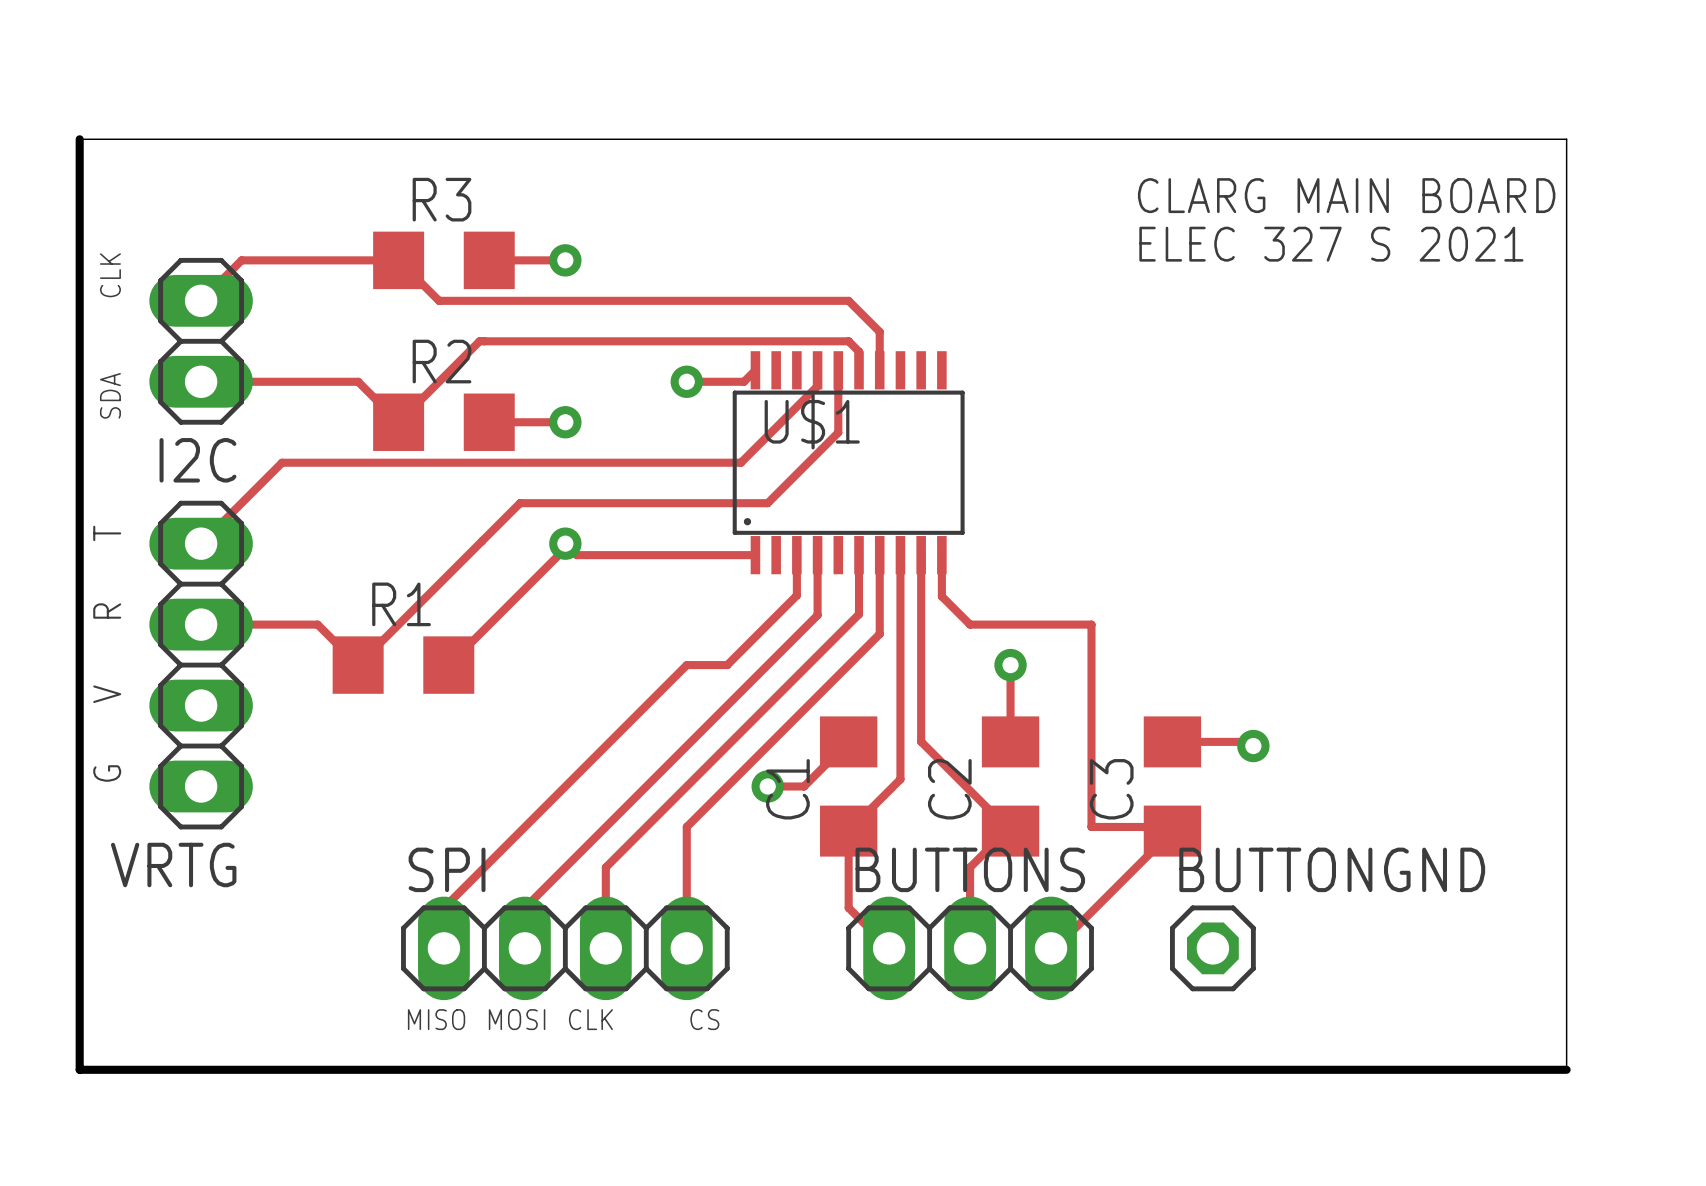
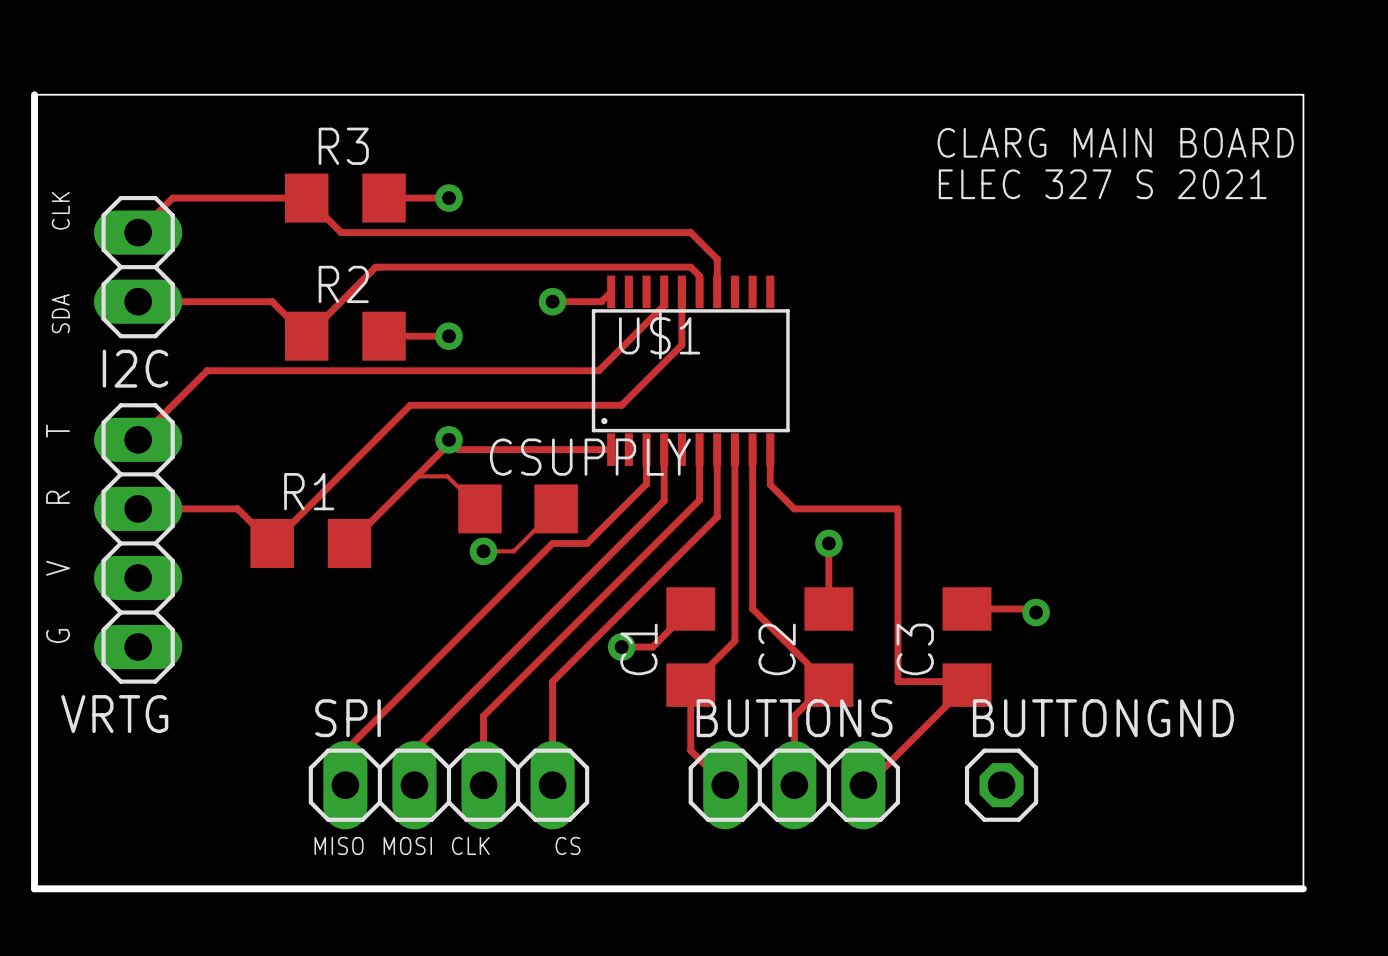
track: none -> (416, 476) (447, 476) (479, 508)
CSUPPLY: none -> (518, 508)
track: none -> (556, 508) (513, 551) (483, 551)
via: none -> (483, 551)

